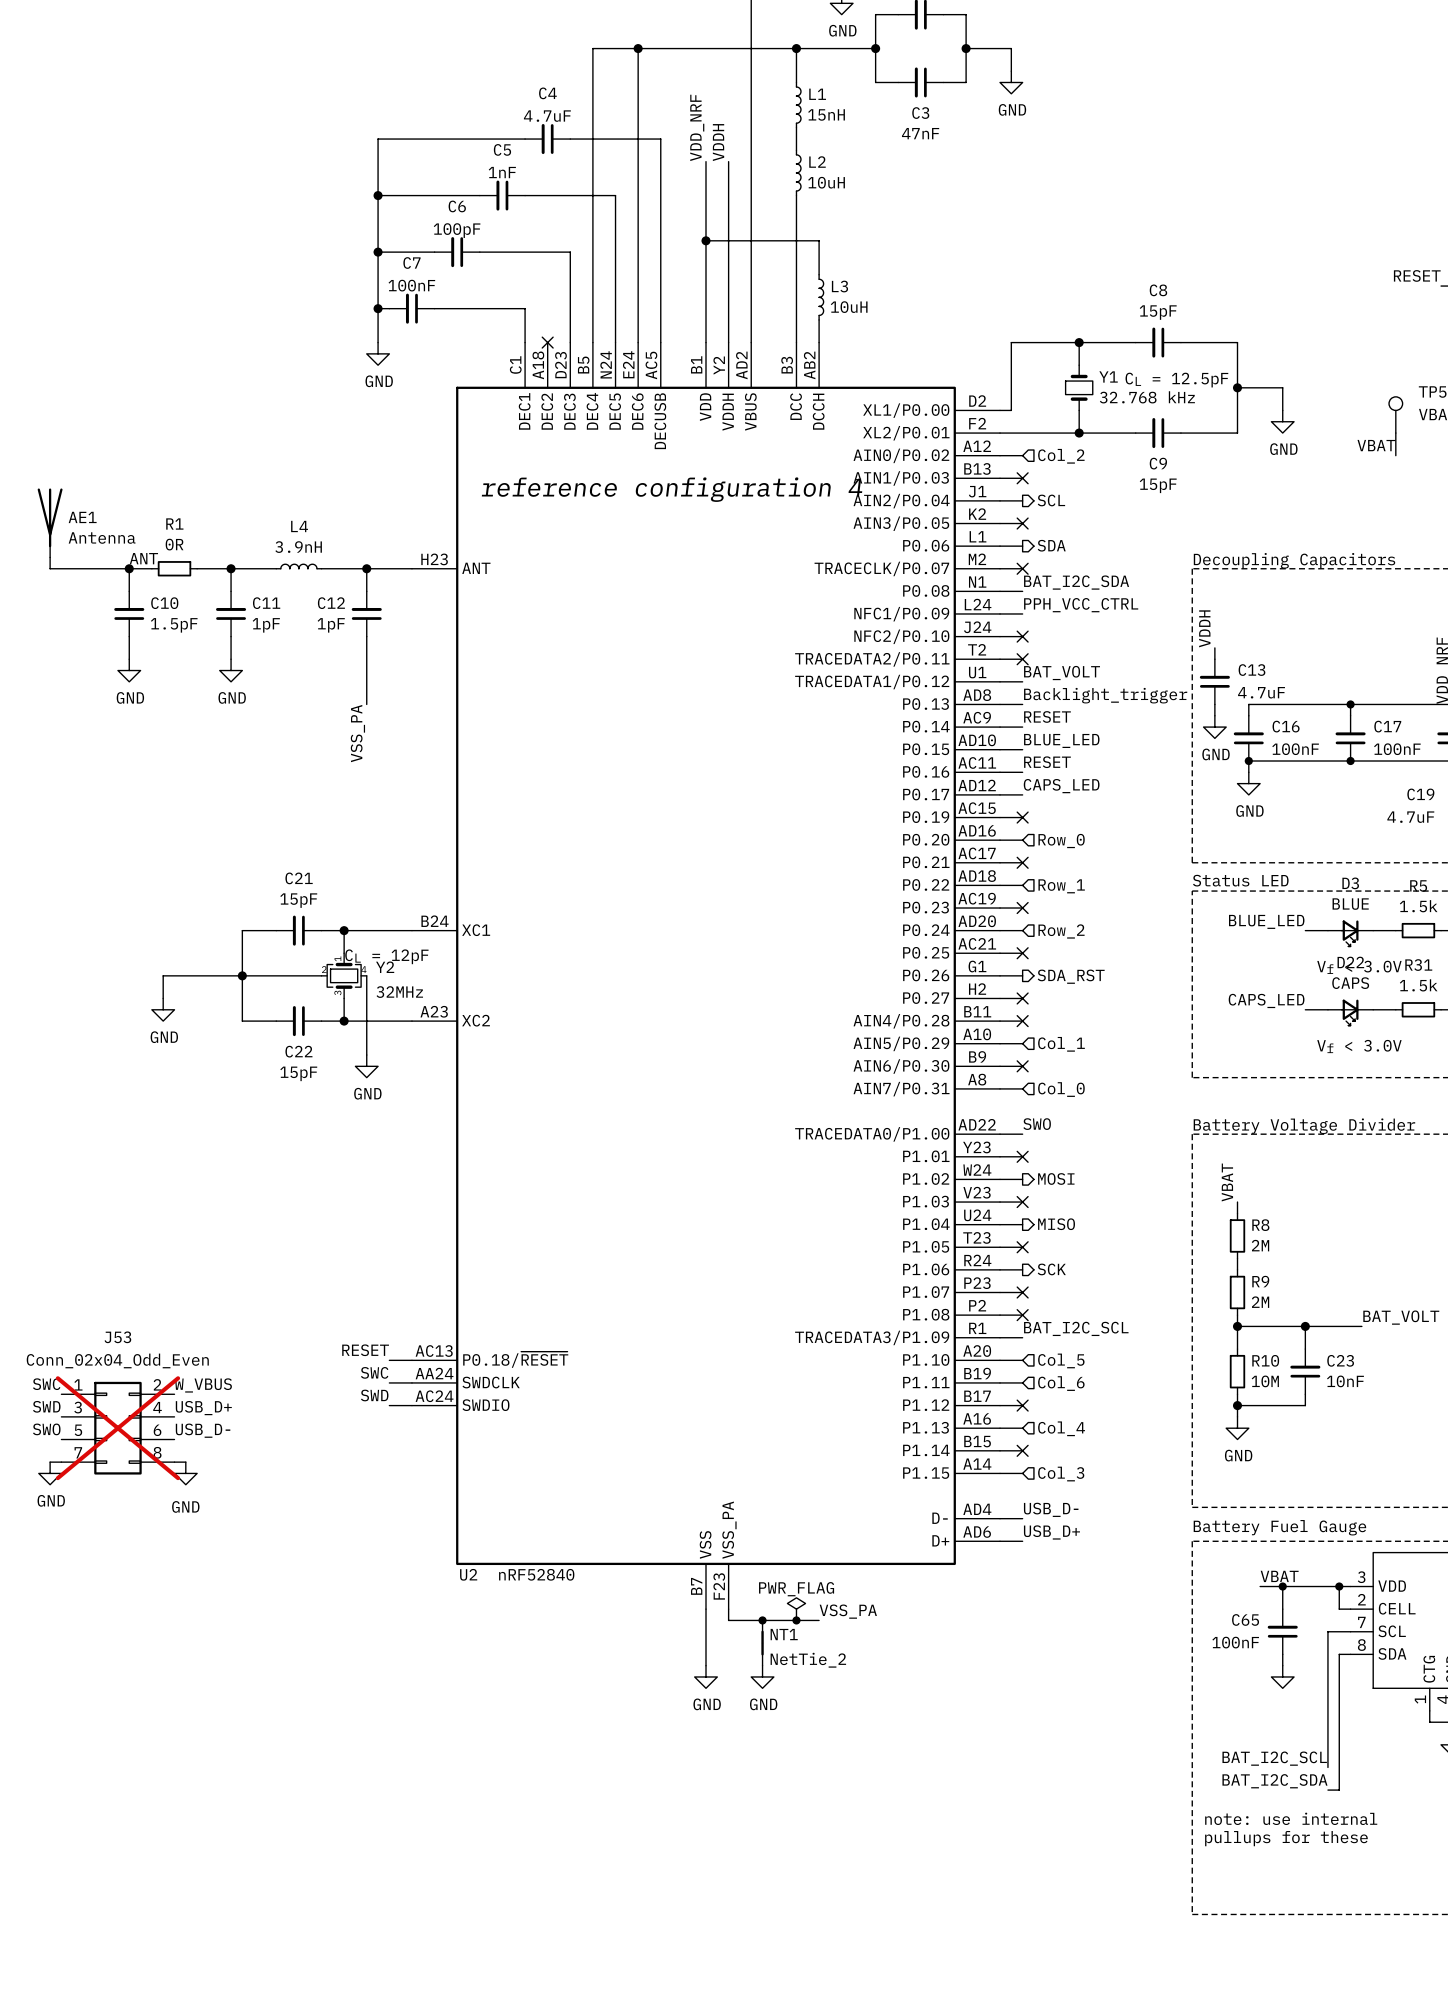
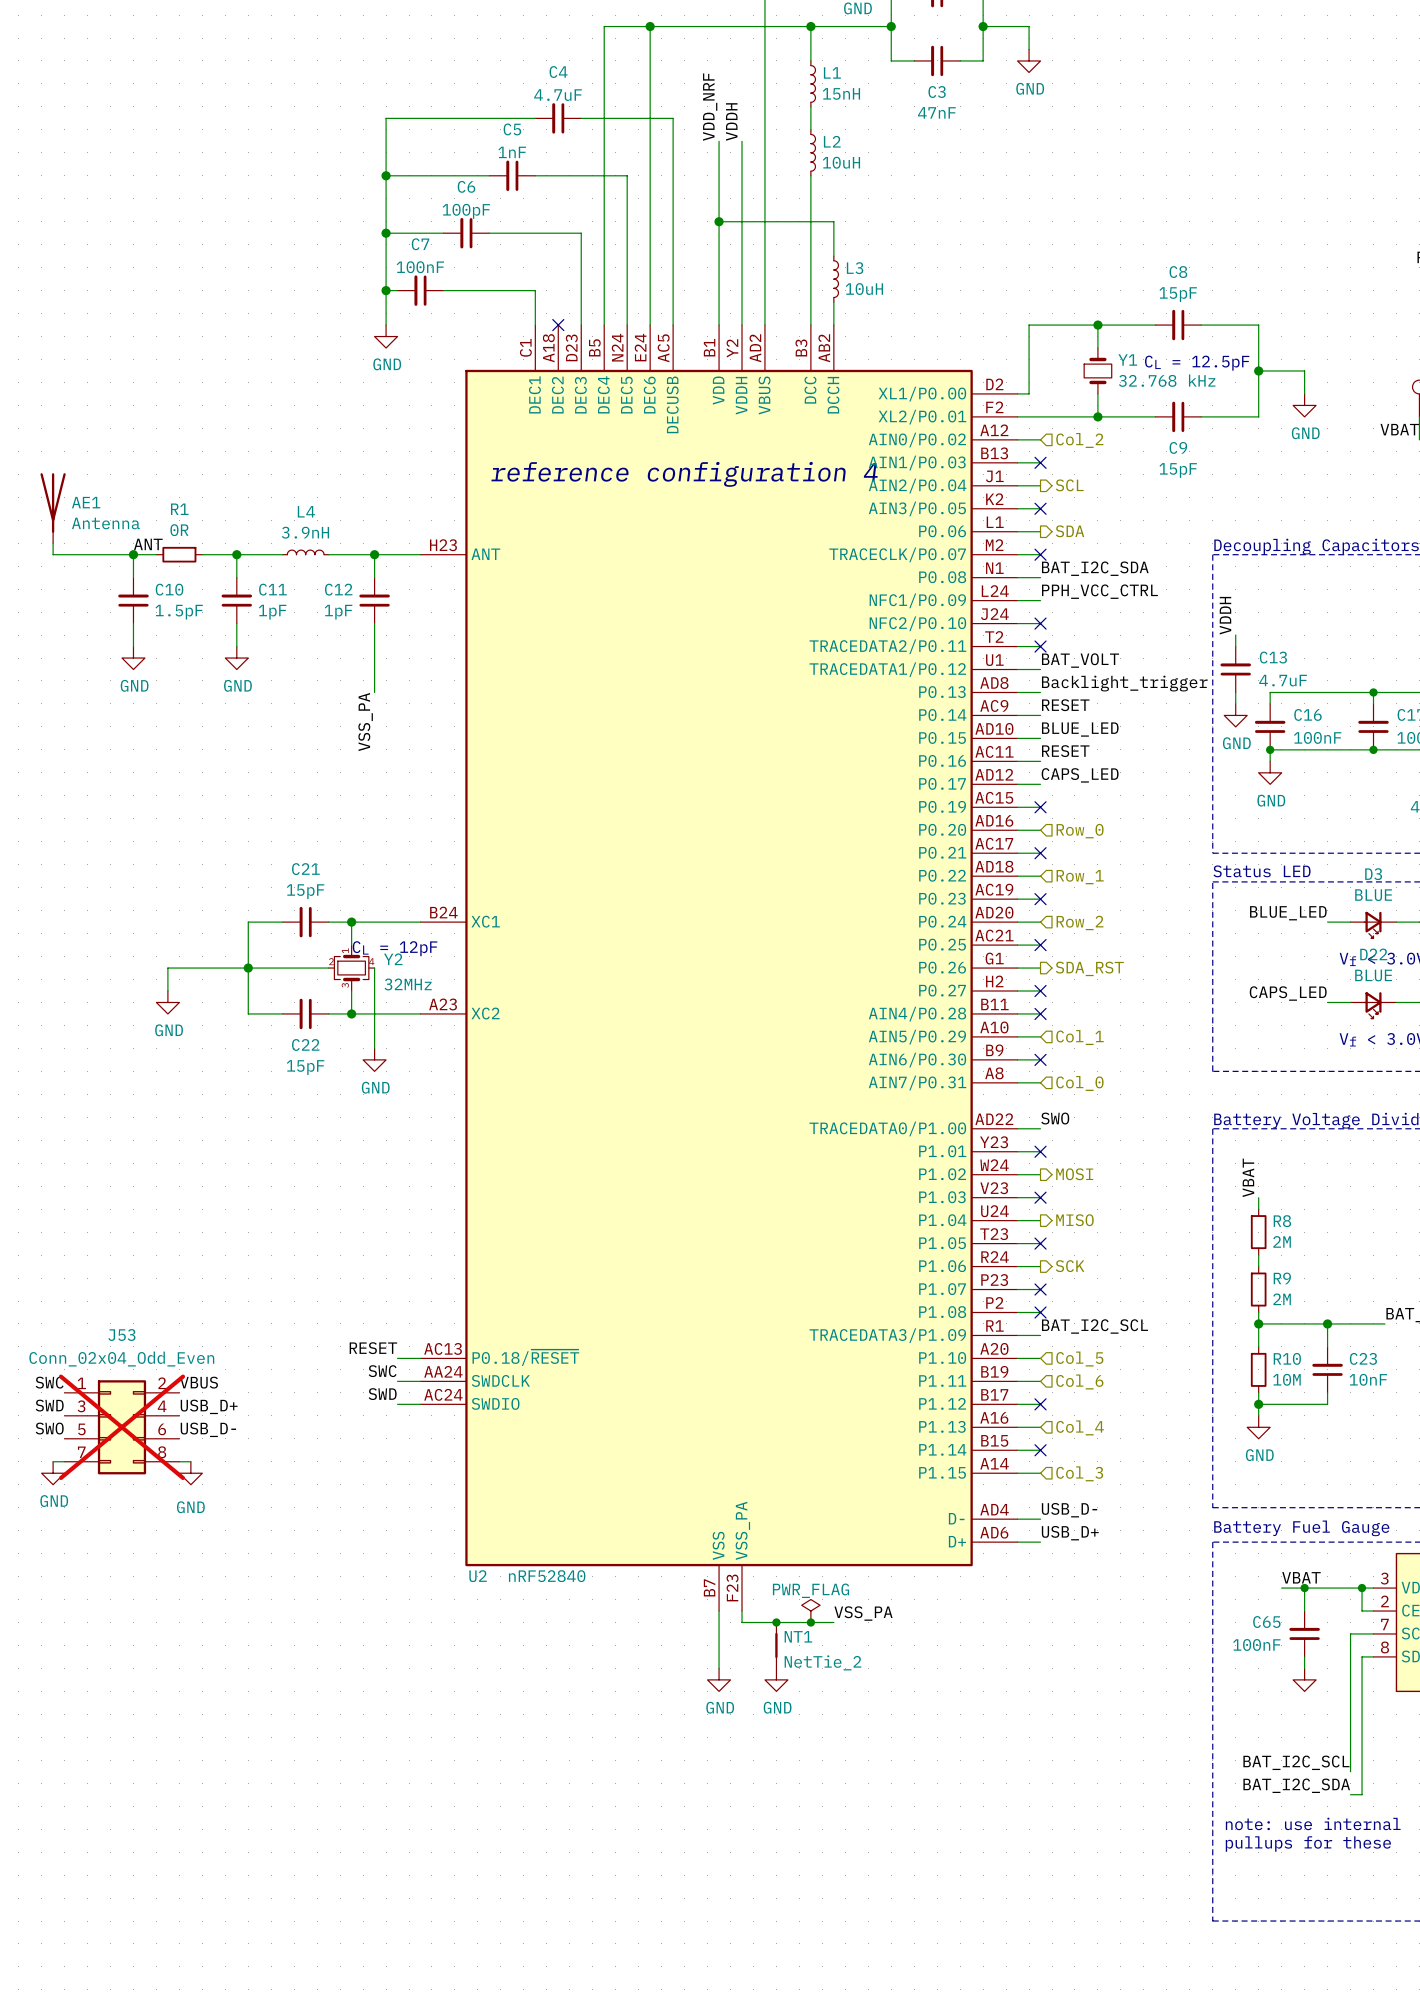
D22 value: CAPS (1350, 983) -> BLUE (1373, 975)
label: W_VBUS (203, 1385) -> VBUS (198, 1382)

